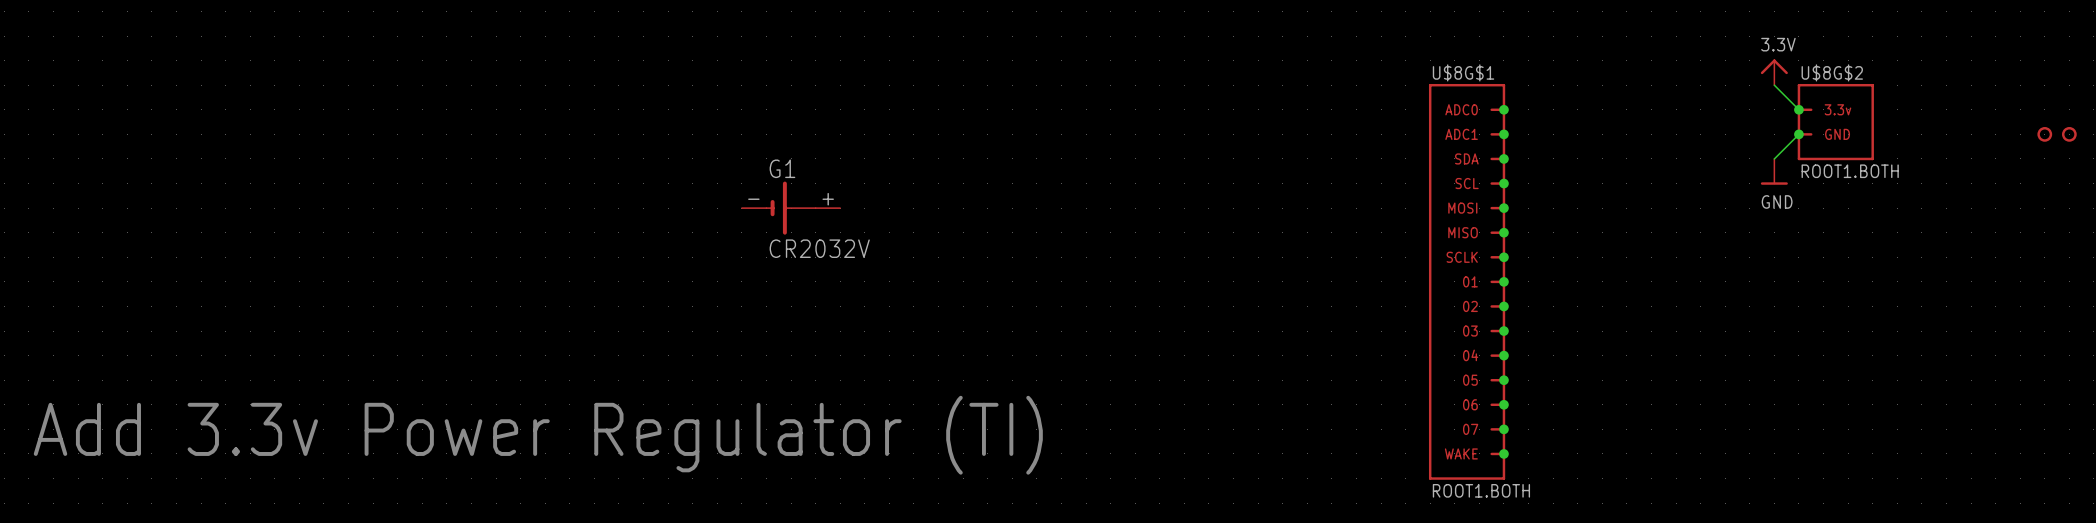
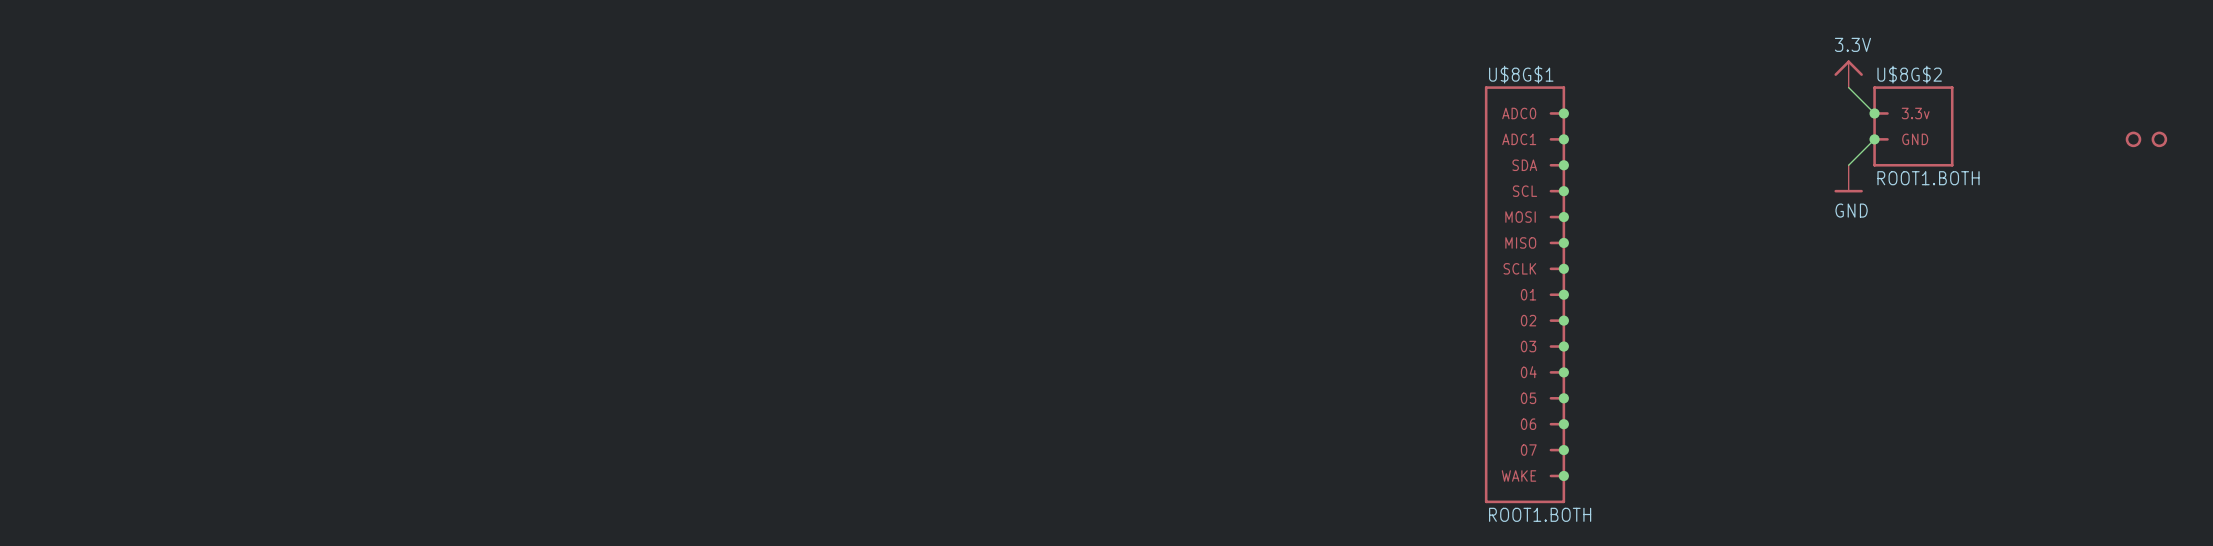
G1: CR2032V (791, 208) -> none
text: Add 3.3v Power Regulator (TI) (538, 435) -> none

